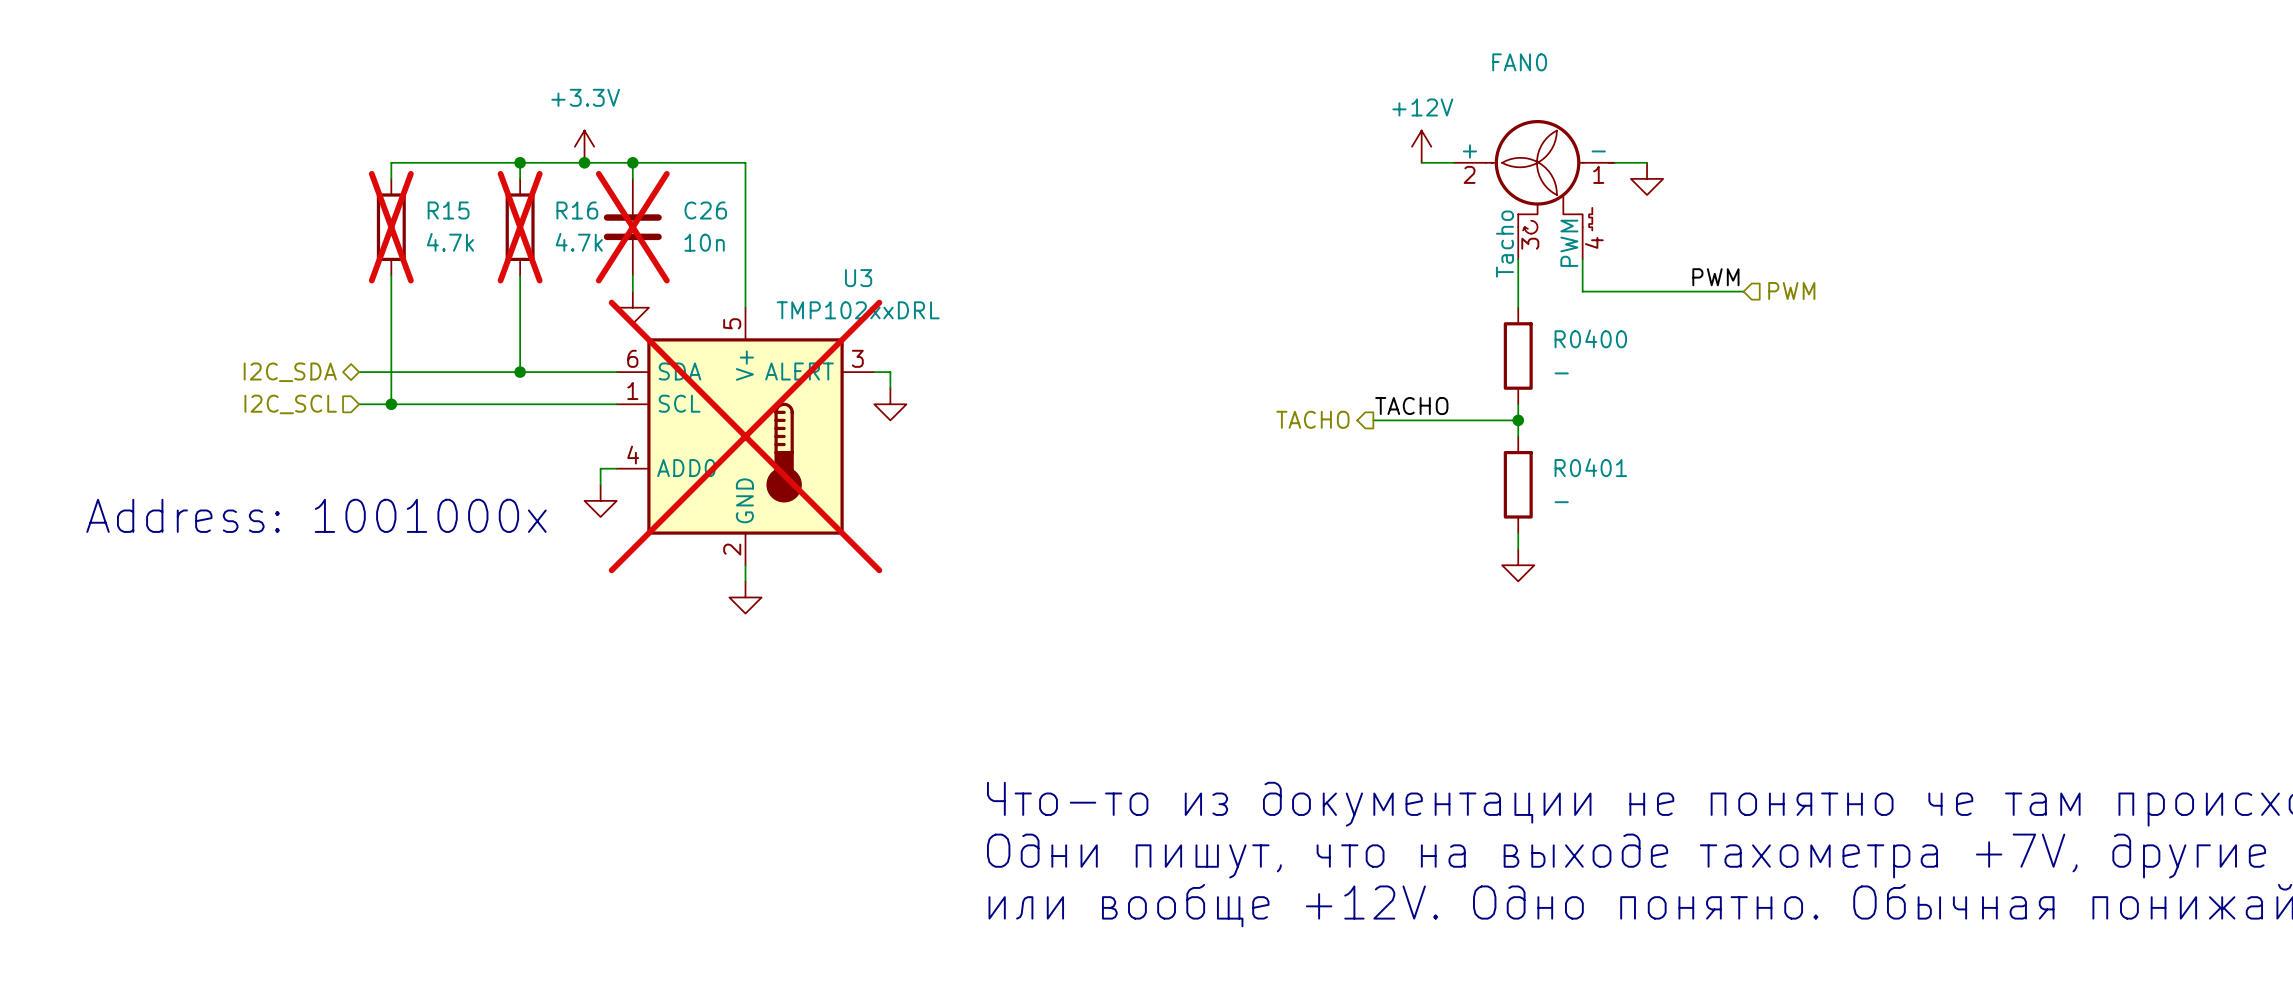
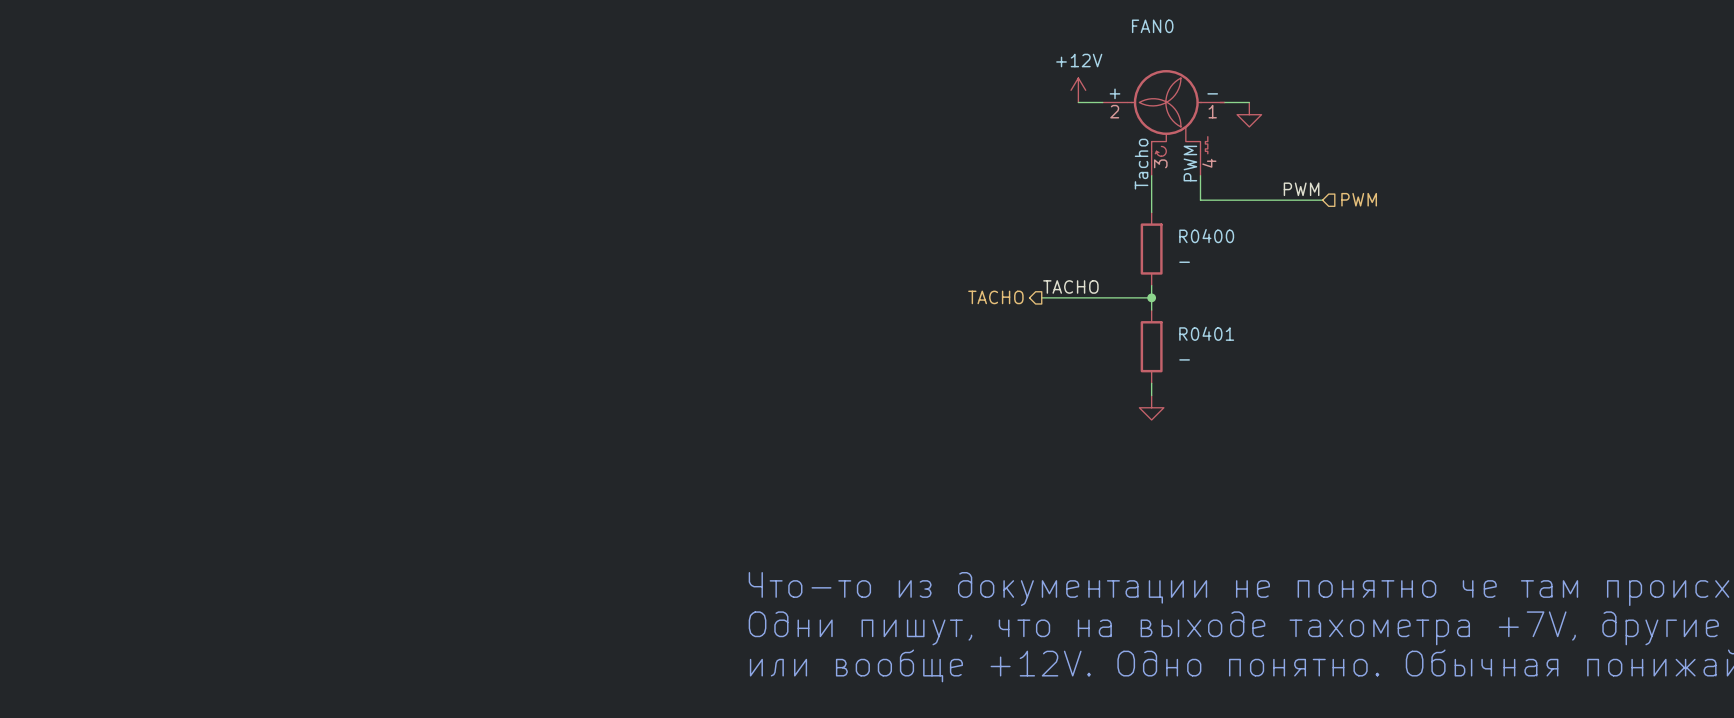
power symbol: +3.3V (584, 146) -> none
wire: (520, 162) (520, 178) -> none
junction: (520, 162) -> none
junction: (584, 162) -> none
wire: (632, 162) (632, 178) -> none
junction: (632, 162) -> none
wire: (391, 178) (391, 162) (745, 162) (745, 307) -> none
R15: 4.7k (391, 227) -> none
R16: 4.7k (520, 227) -> none
C26: 10n (632, 227) -> none
wire: (391, 275) (391, 404) -> none
wire: (520, 275) (520, 372) -> none
wire: (632, 275) (632, 291) -> none
power symbol: (632, 307) -> none
hierarchical label: I2C_SDA (290, 372) -> none
wire: (359, 372) (616, 372) -> none
junction: (520, 372) -> none
wire: (874, 372) (890, 372) (890, 388) -> none
hierarchical label: I2C_SCL (290, 404) -> none
wire: (359, 404) (616, 404) -> none
junction: (391, 404) -> none
power symbol: (890, 404) -> none
U3: TMP102xxDRL (745, 436) -> none
wire: (616, 468) (600, 468) (600, 484) -> none
power symbol: (600, 500) -> none
text: Address: 1001000x (316, 515) -> none
wire: (745, 565) (745, 581) -> none
power symbol: (745, 597) -> none

